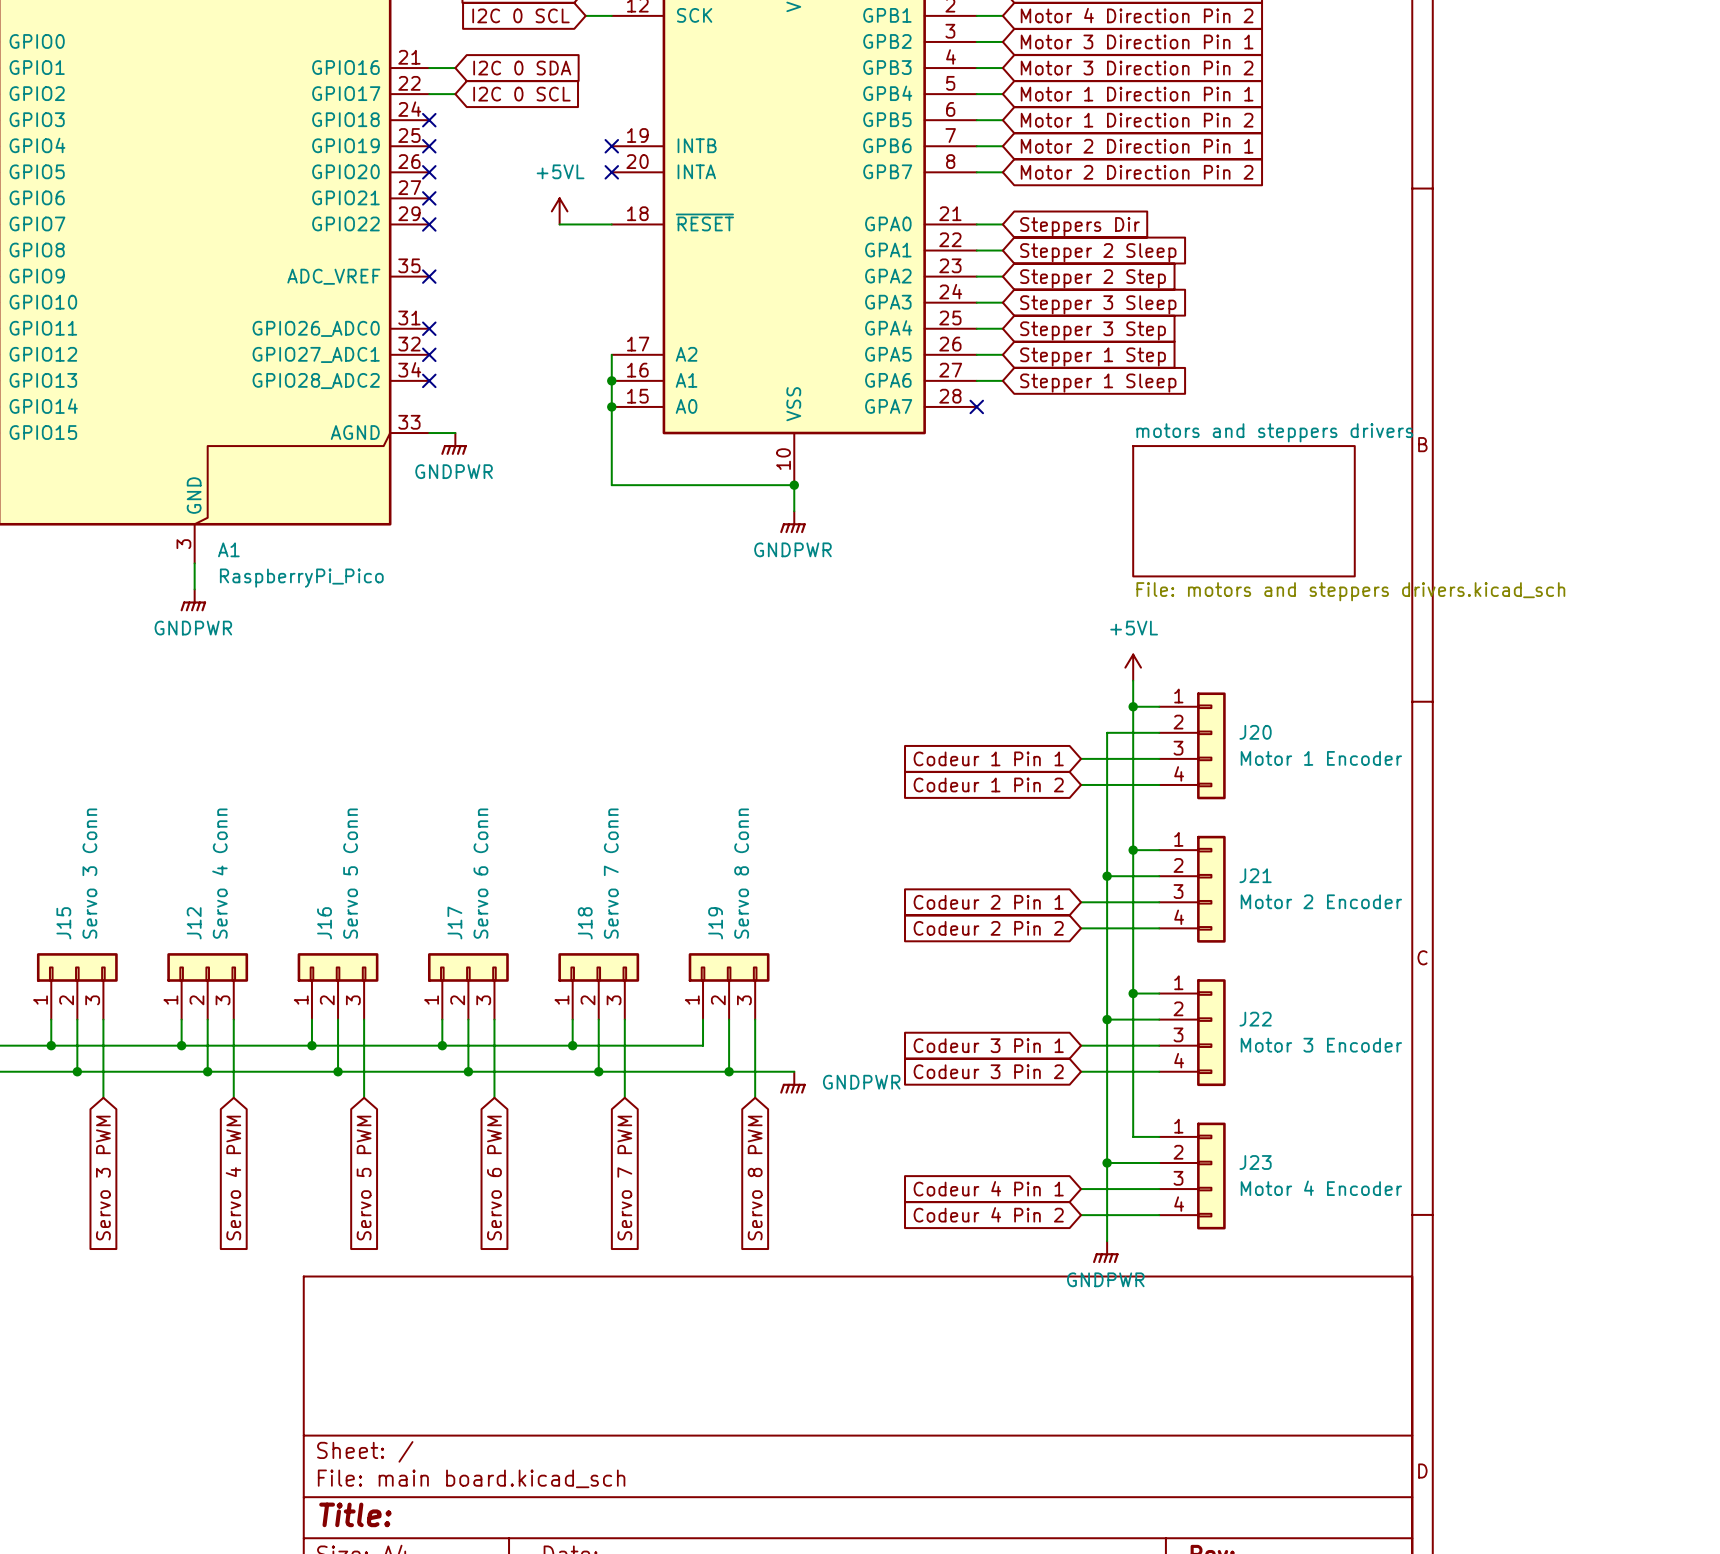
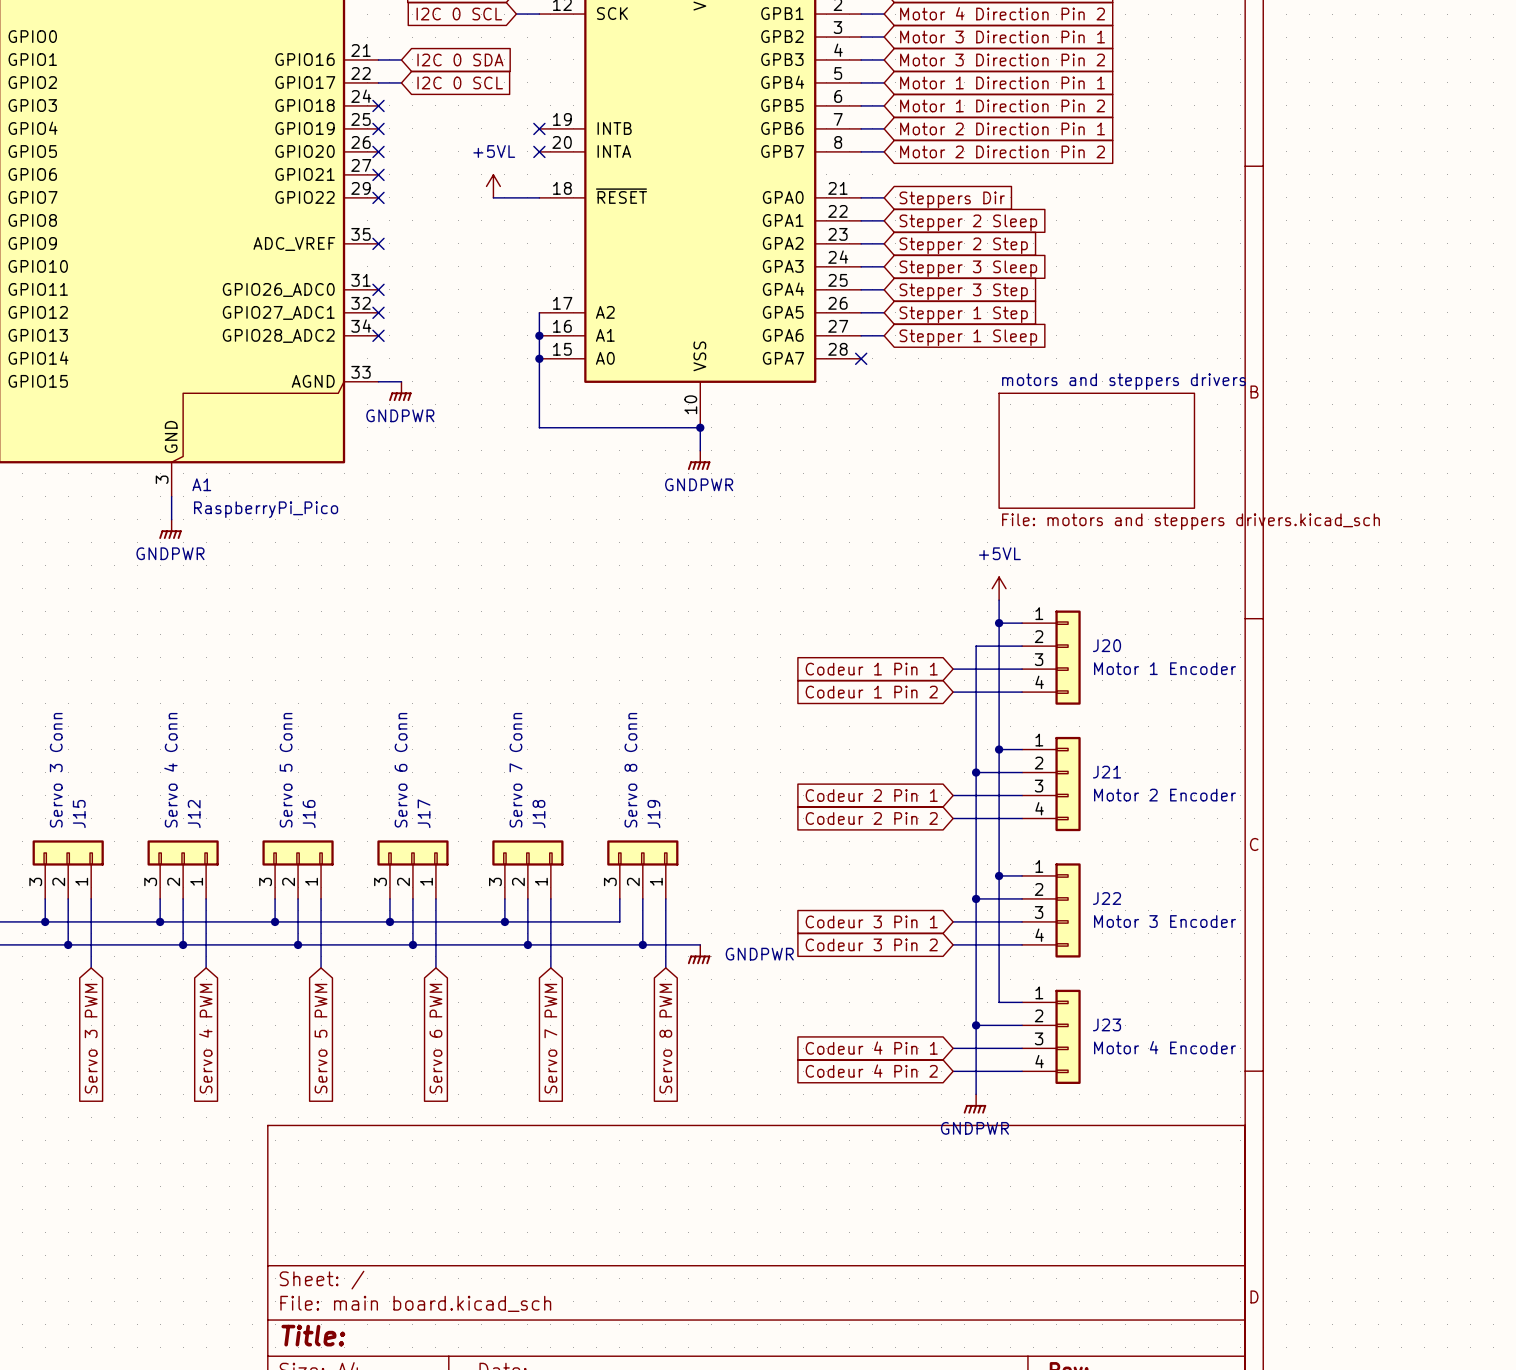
J15 flip: as is (77, 967) -> left-right (68, 852)
J12 flip: as is (207, 967) -> left-right (183, 852)
J16 flip: as is (338, 967) -> left-right (298, 852)
J17 flip: as is (468, 967) -> left-right (412, 852)
J18 flip: as is (598, 967) -> left-right (527, 852)
J19 flip: as is (729, 967) -> left-right (642, 852)

